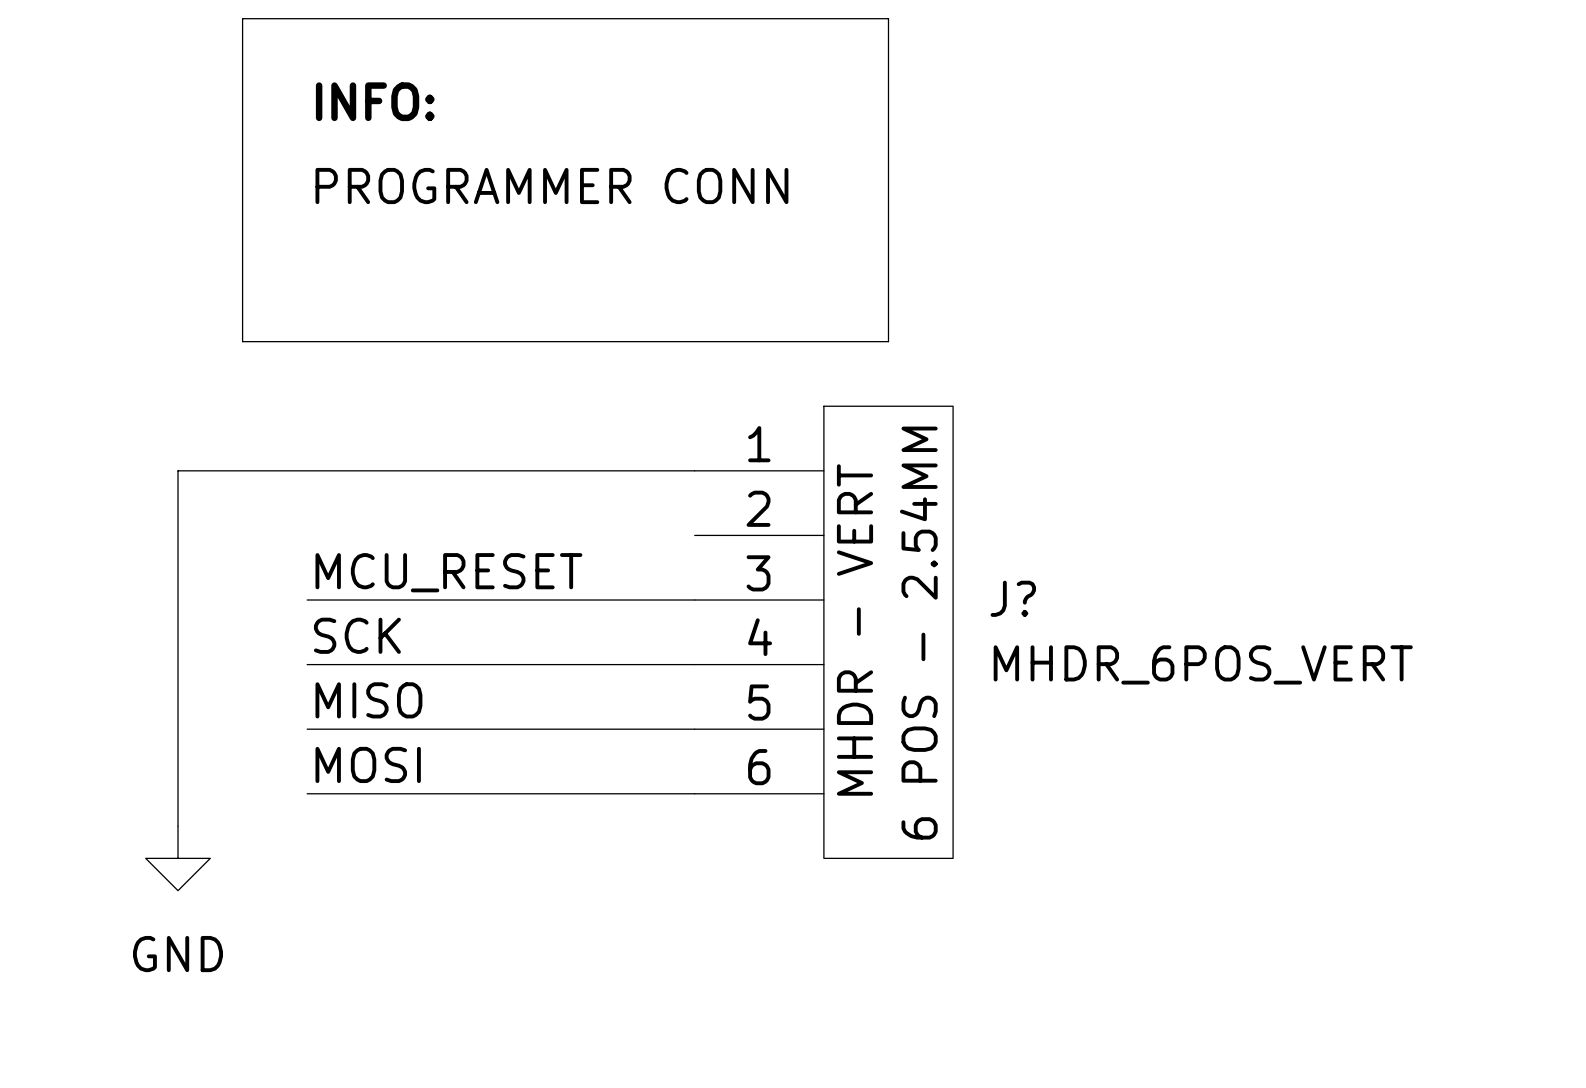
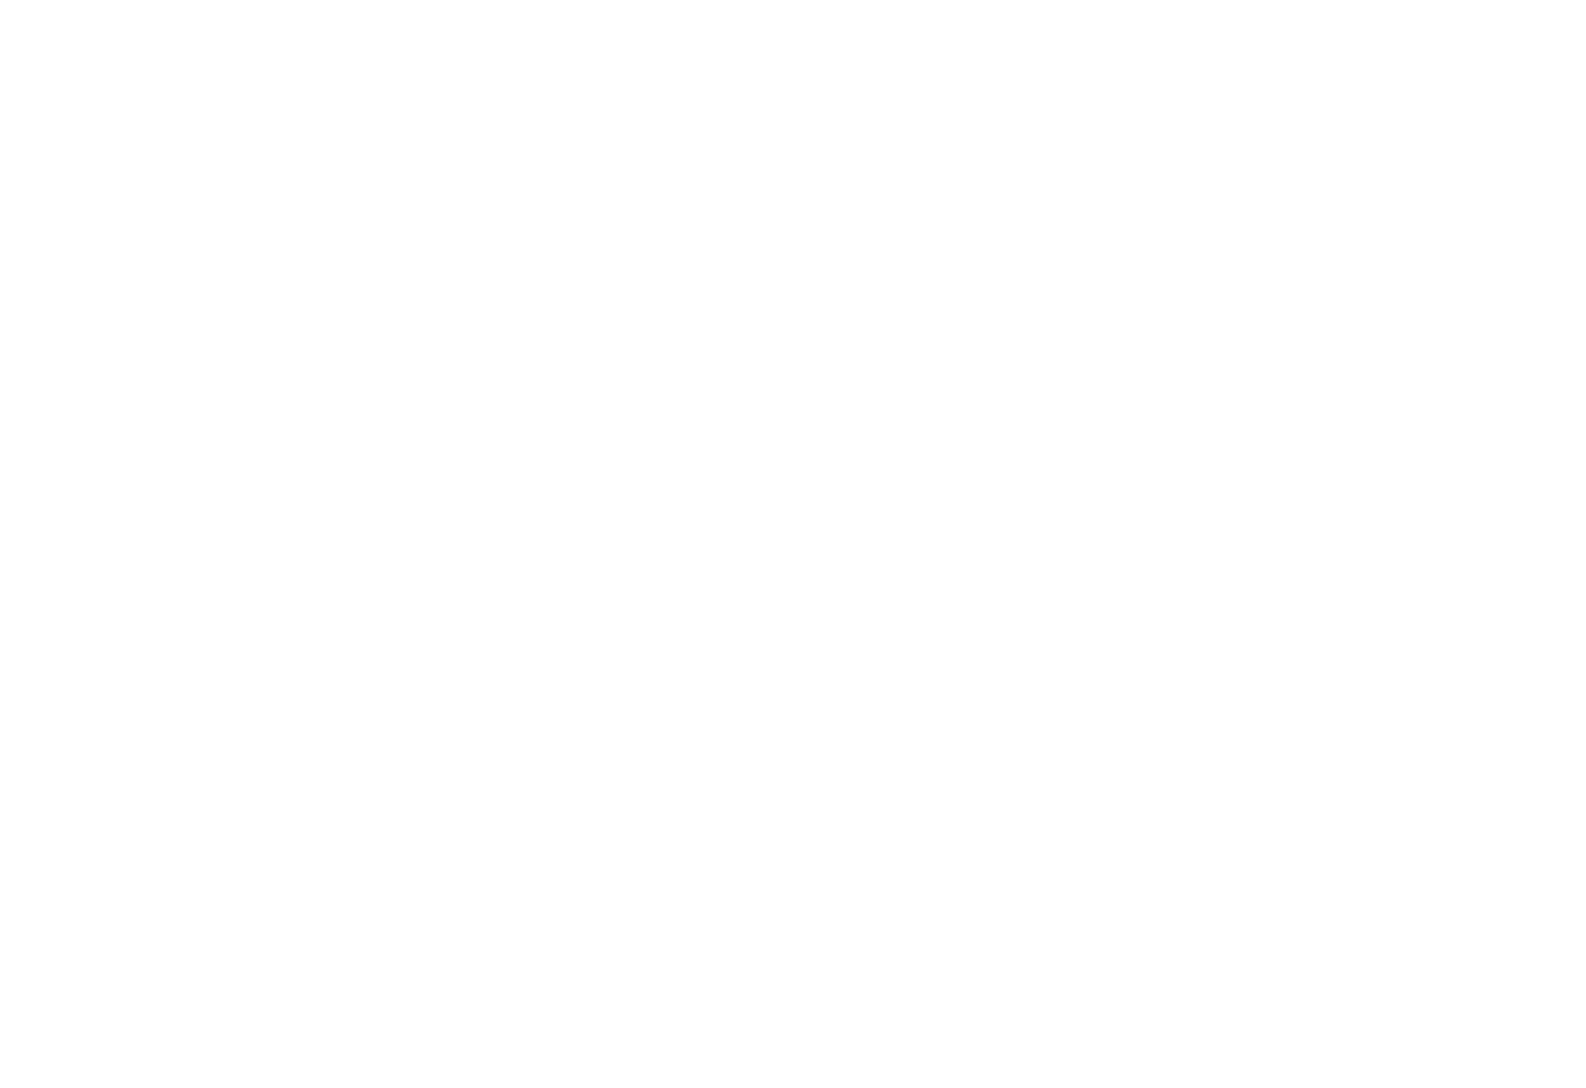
line: (242, 18) (888, 18) (888, 341) (242, 341) (242, 18) -> none
text: INFO: (375, 101) -> none
text: PROGRAMMER CONN (551, 186) -> none
wire: (694, 470) (178, 470) (178, 826) -> none
label: MCU_RESET (448, 572) -> none
wire: (307, 600) (694, 600) -> none
J?: MHDR_6POS_VERT (823, 632) -> none
label: SCK (357, 635) -> none
wire: (307, 664) (694, 664) -> none
label: MISO (368, 700) -> none
wire: (307, 729) (694, 729) -> none
label: MOSI (368, 764) -> none
wire: (307, 793) (694, 793) -> none
power symbol: GND (178, 858) -> none

